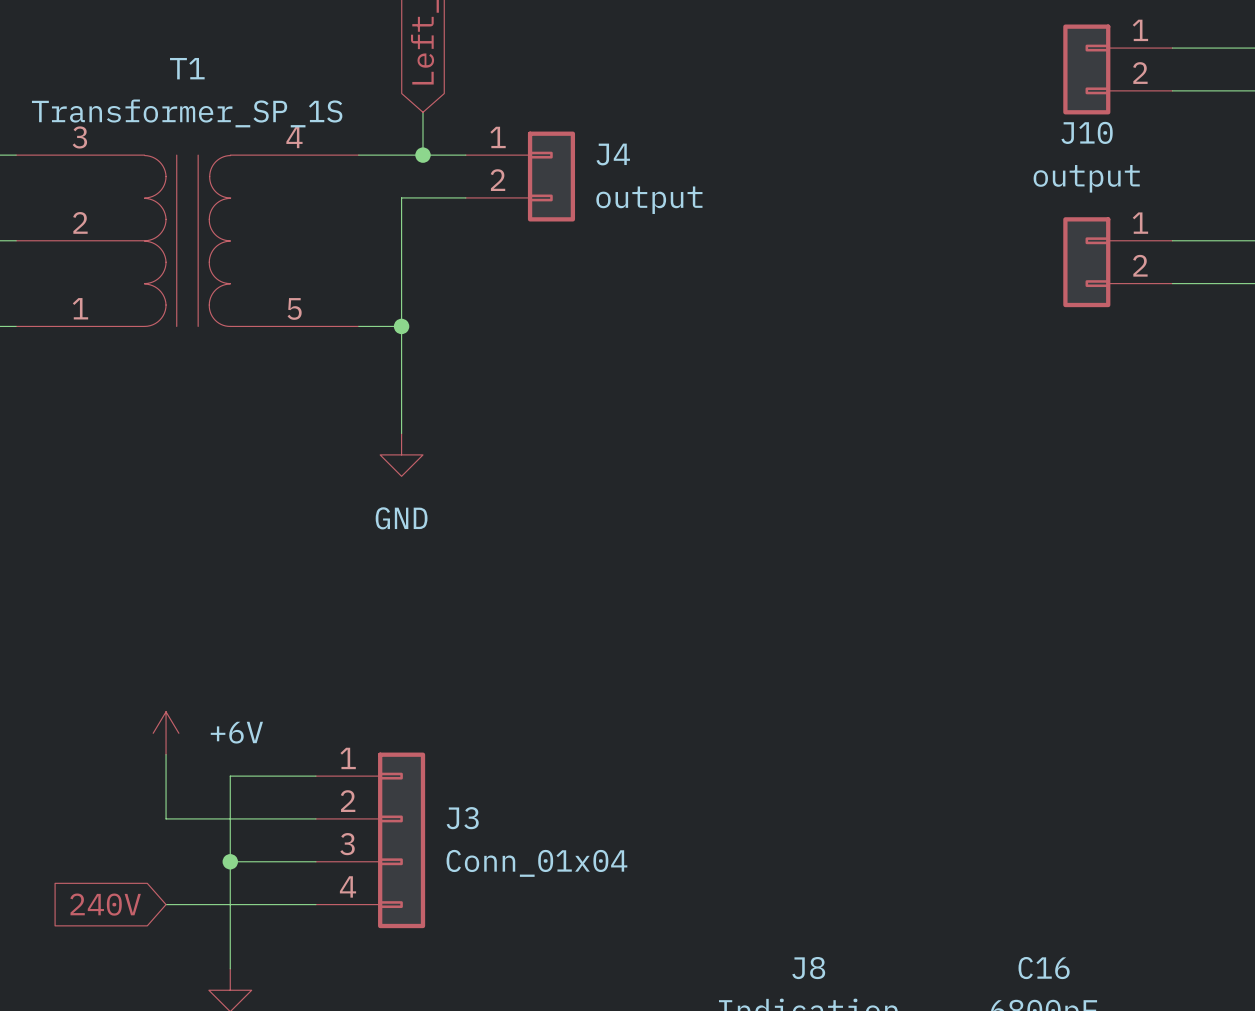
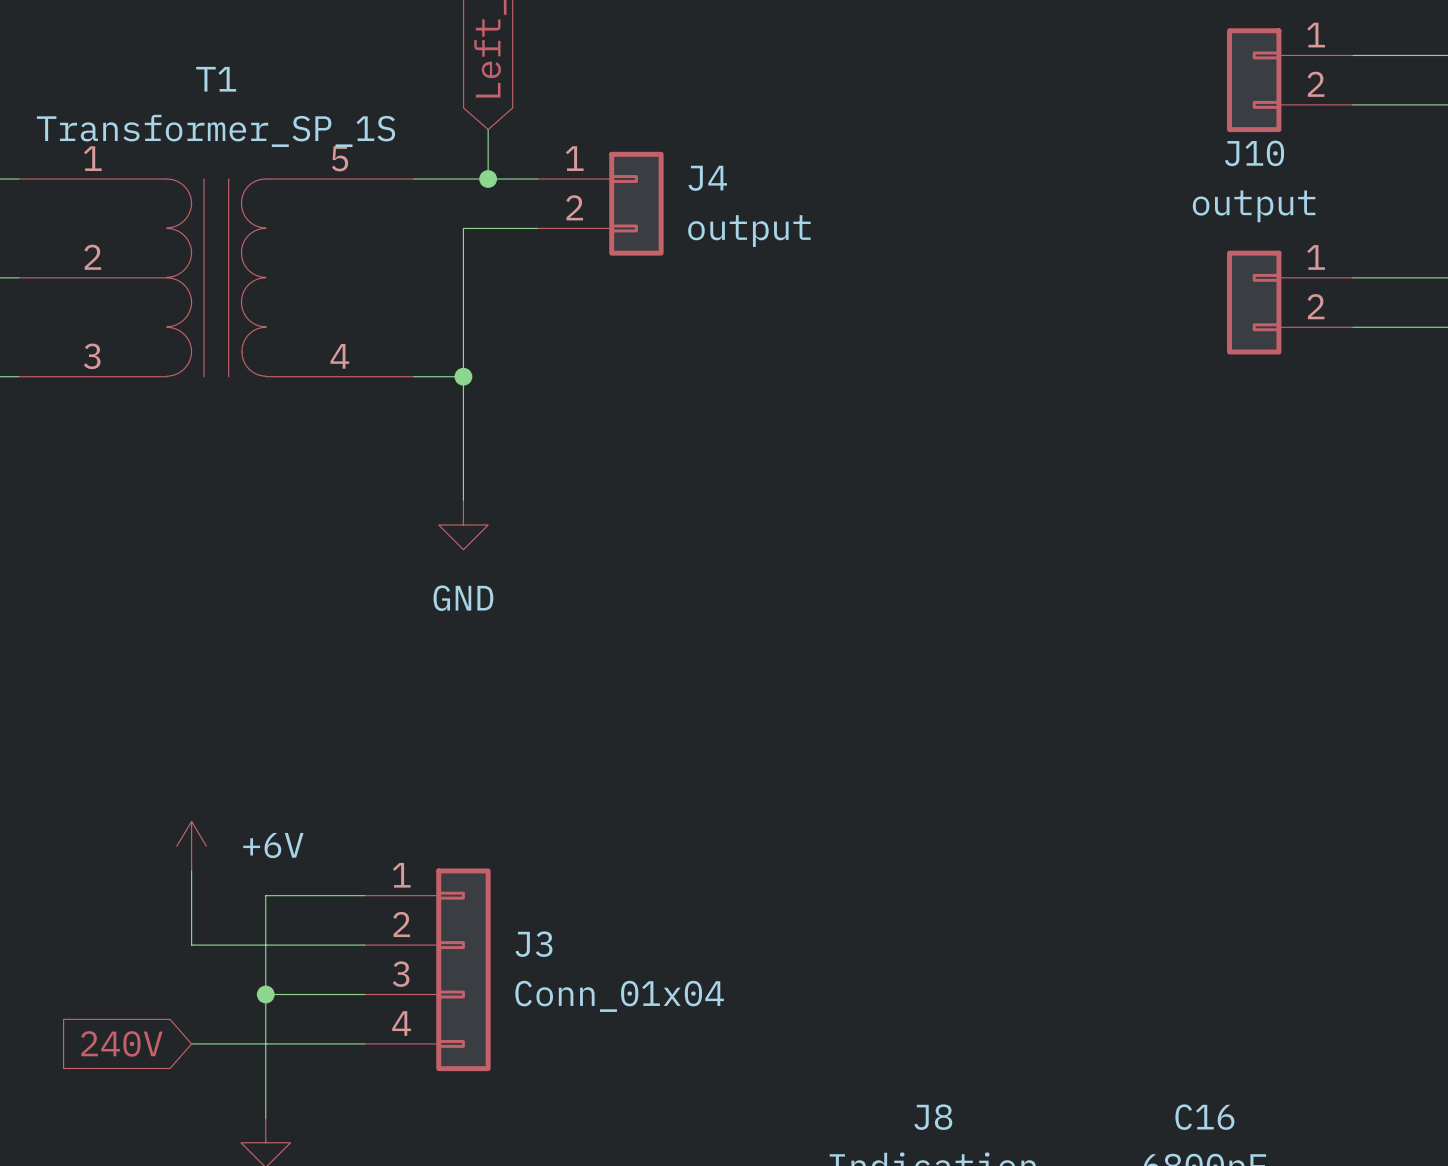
T1 flip: as is (187, 240) -> up-down (216, 277)

